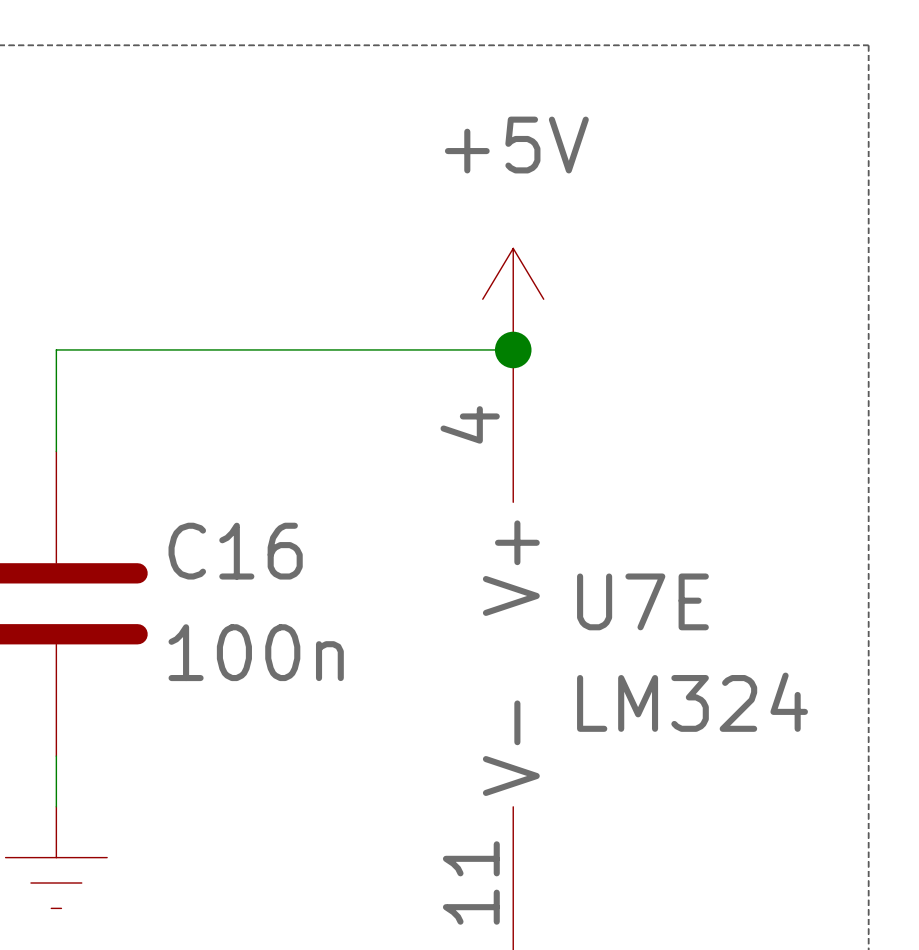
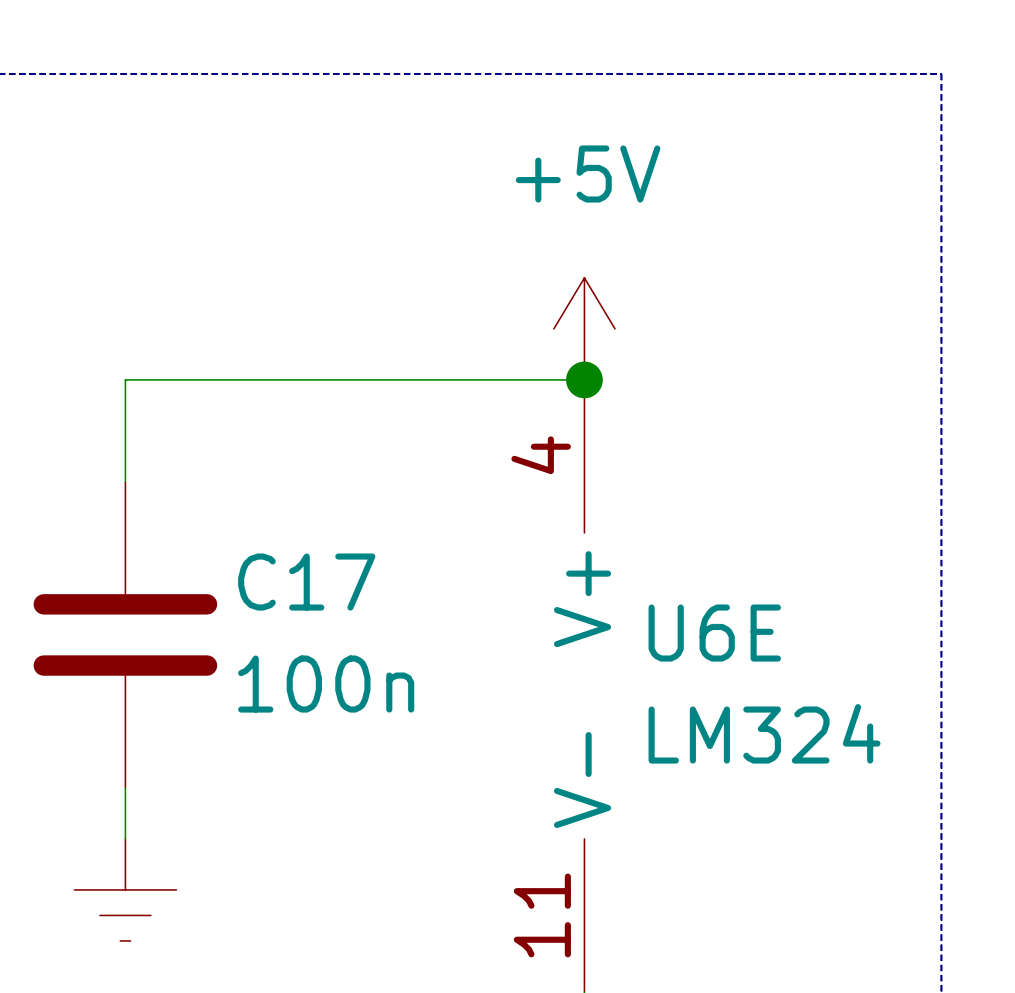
C16 name: C16 (235, 551) -> C17 (306, 582)
U7E name: U7E (642, 601) -> U6E (714, 633)

